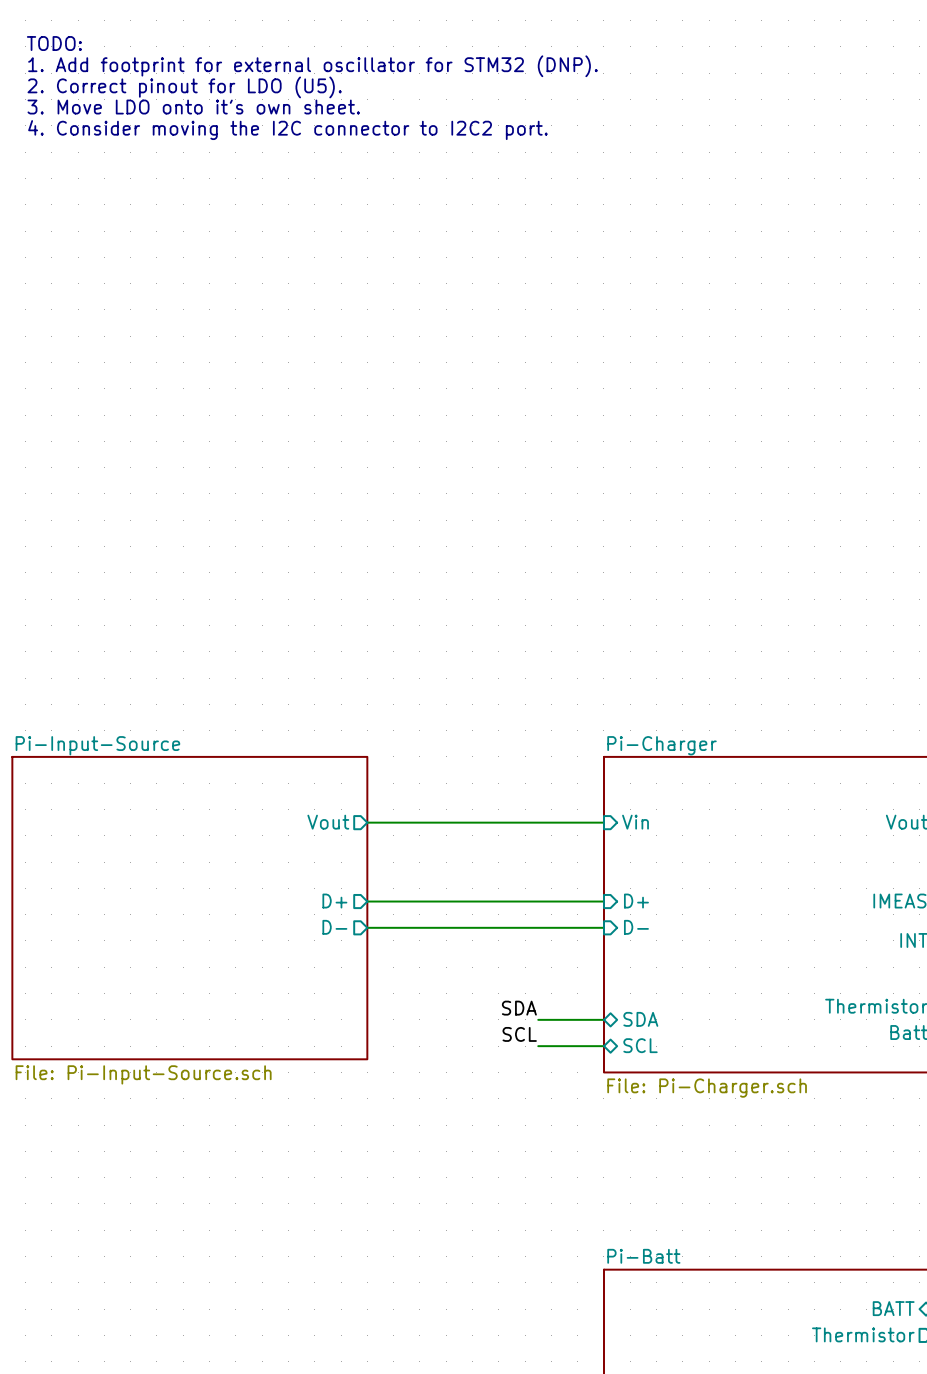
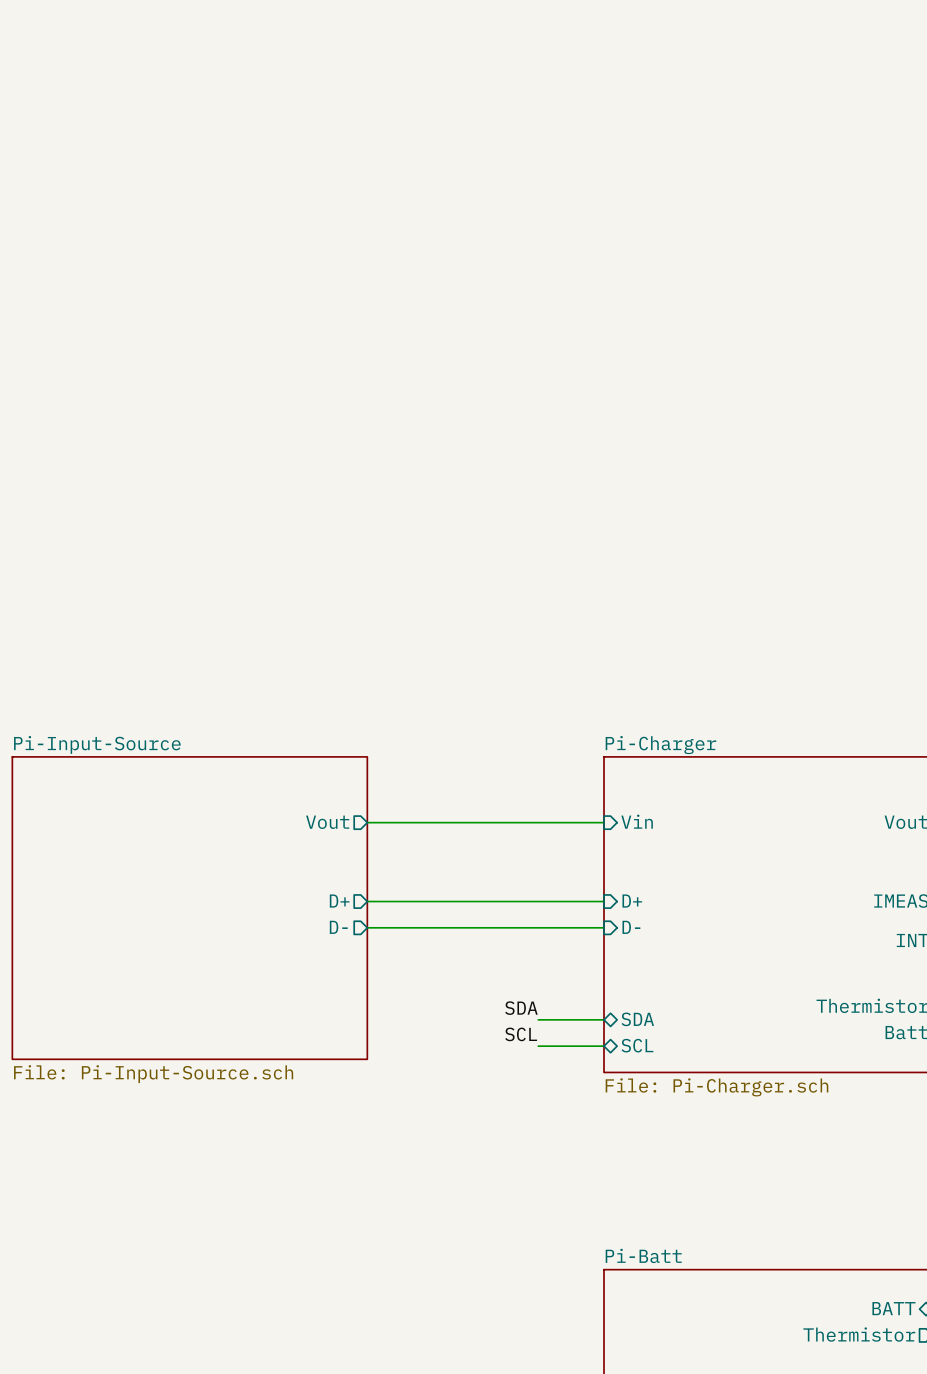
text: TODO: (54, 43) -> none
text: 1. Add footprint for external oscillator for STM32 (DNP). (312, 66) -> none
text: 2. Correct pinout for LDO (U5). (184, 87) -> none
text: 3. Move LDO onto it's own sheet. (193, 107) -> none
text: 4. Consider moving the I2C connector to I2C2 port. (287, 130) -> none

